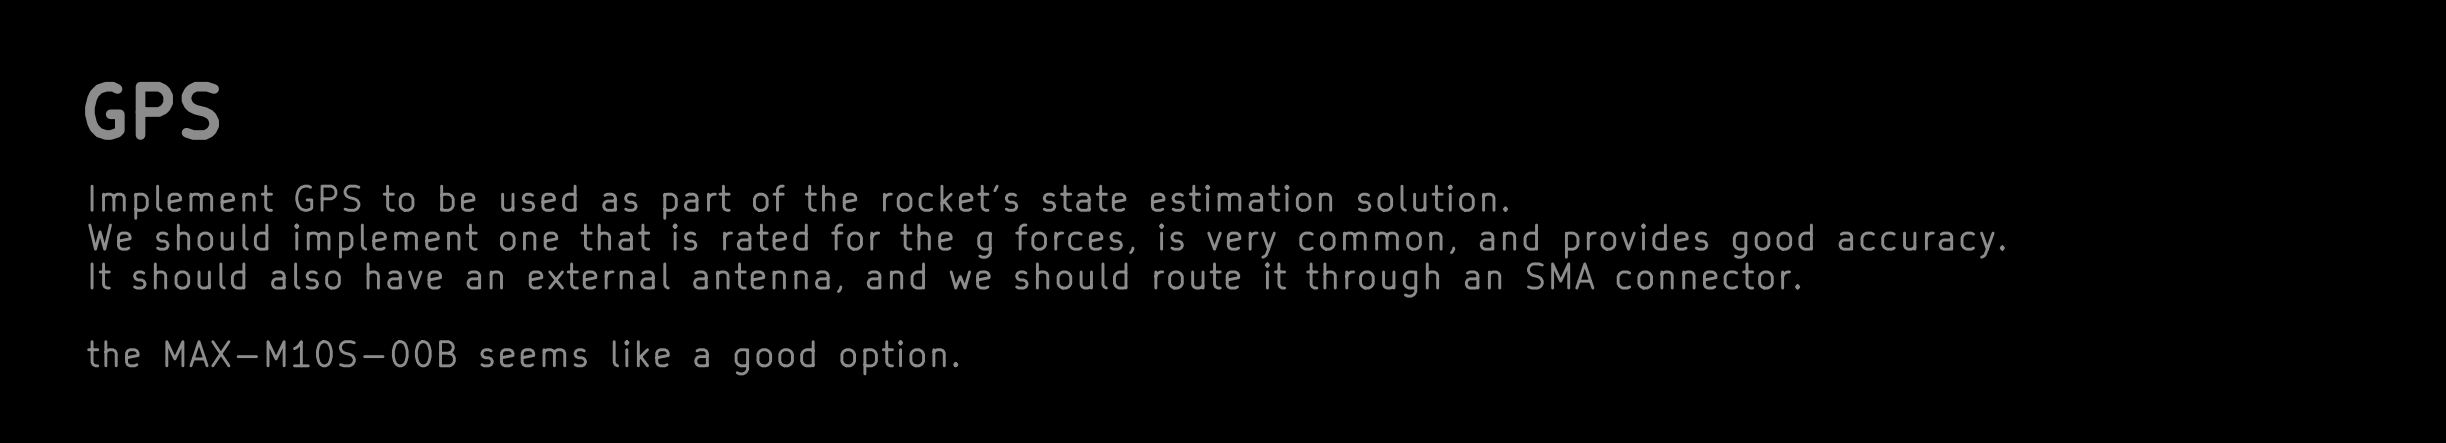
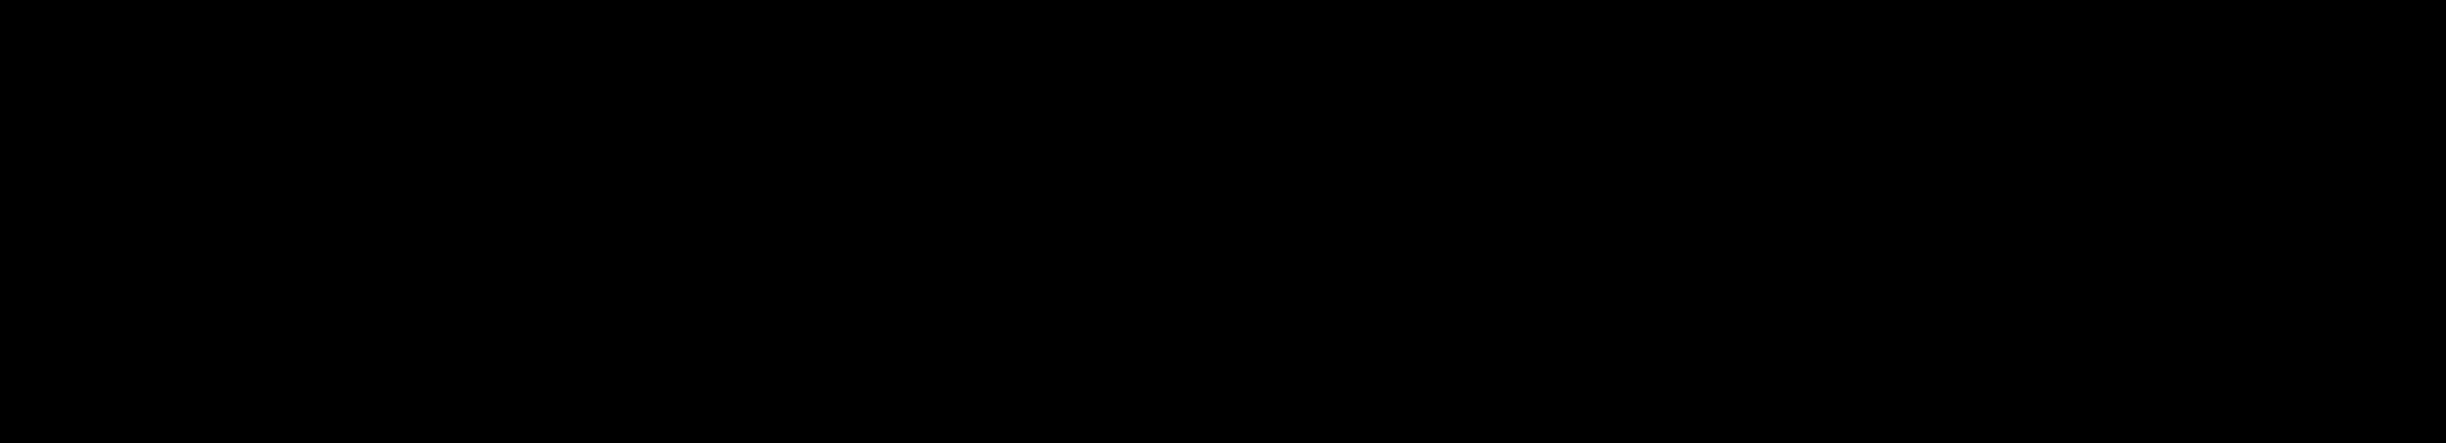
text: GPS (152, 110) -> none
text: Implement GPS to be used as part of the rocket's state estimation solution. (799, 202) -> none
text: We should implement one that is rated for the g forces, is very common, and provides good accuracy. (1046, 241) -> none
text: It should also have an external antenna, and we should route it through an SMA connector. (945, 280) -> none
text: the MAX-M10S-00B seems like a good option. (522, 357) -> none

